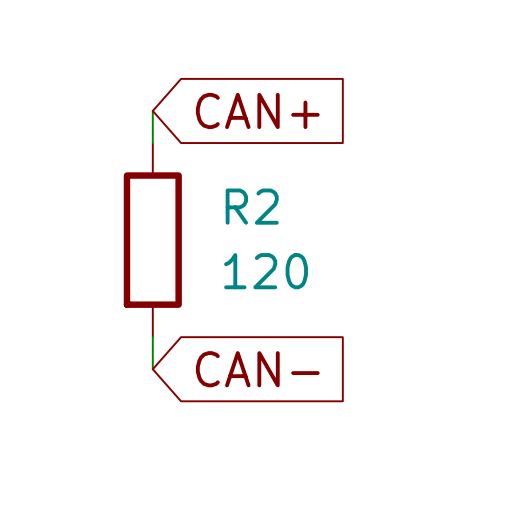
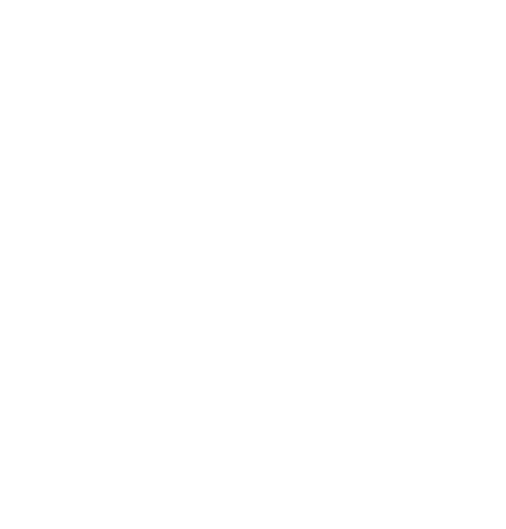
wire: (152, 110) (152, 143) -> none
global label: CAN+ (257, 110) -> none
R2: 120 (152, 240) -> none
wire: (152, 336) (152, 369) -> none
global label: CAN- (257, 369) -> none

